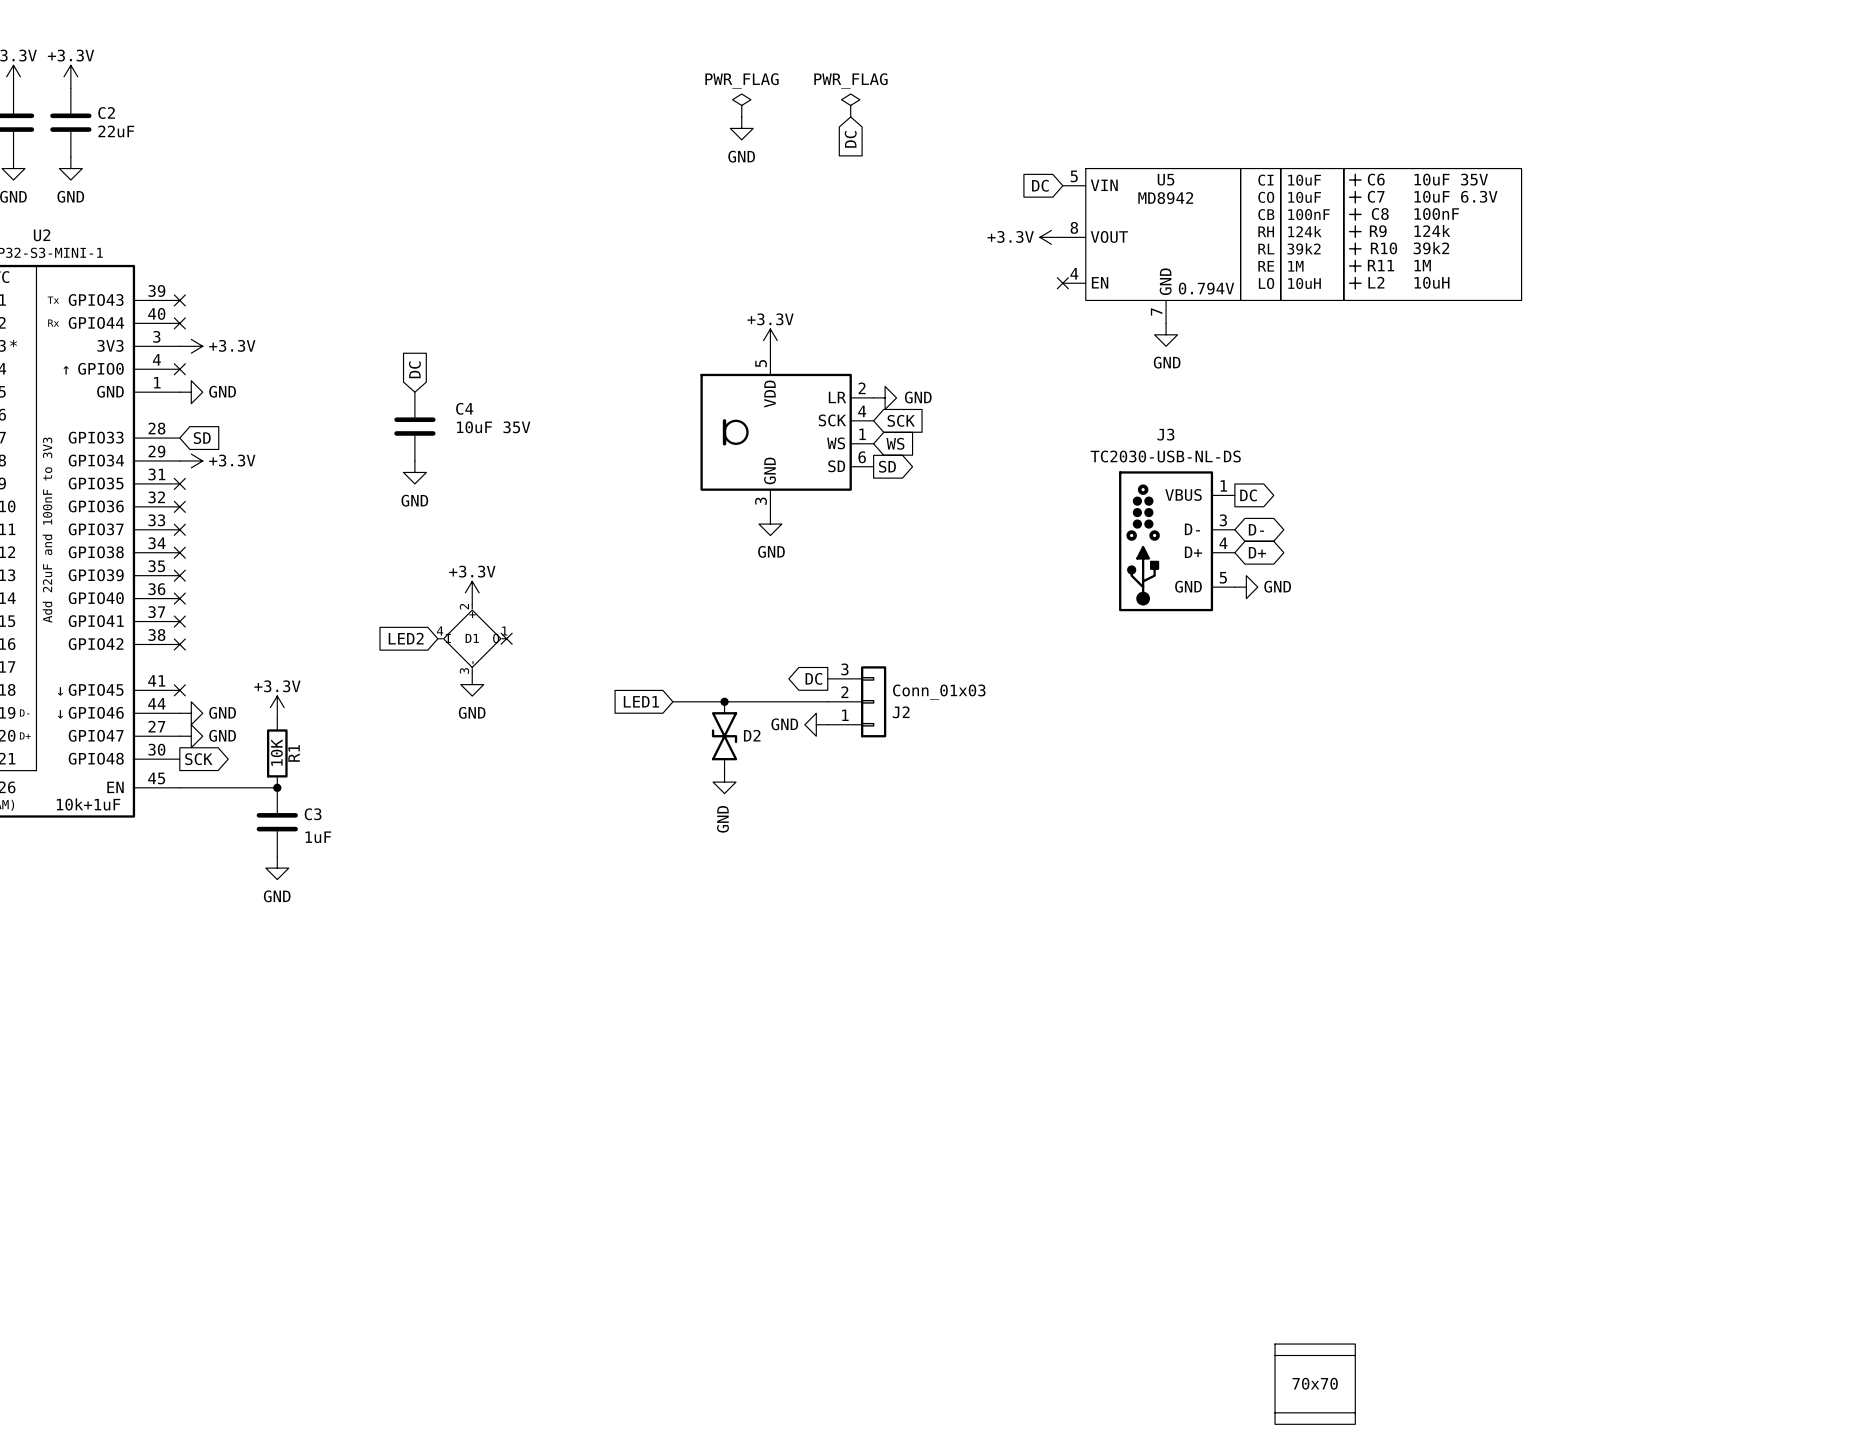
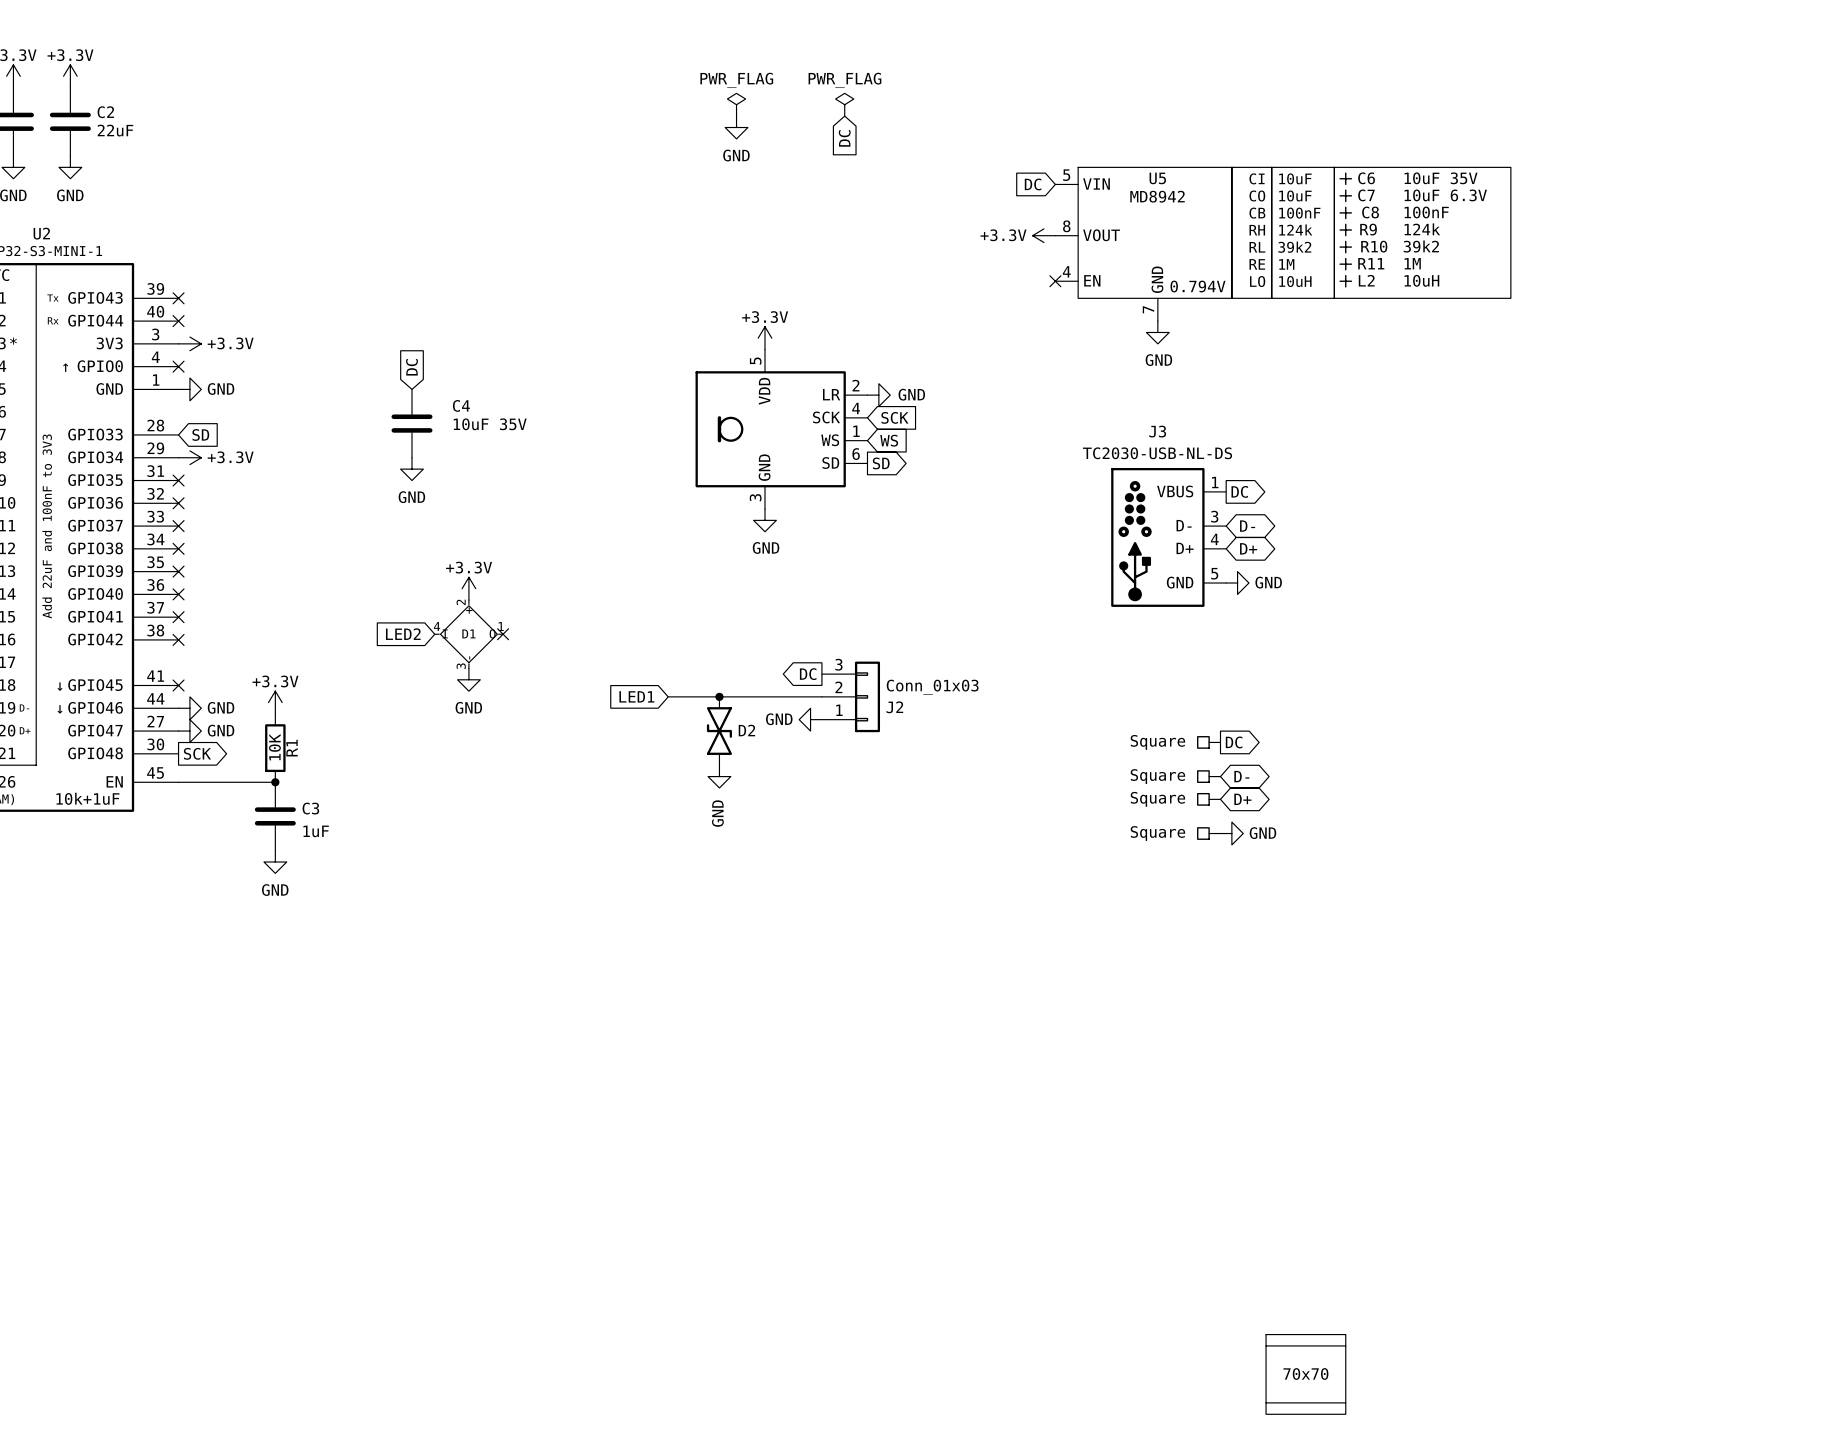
part: none -> Square (1208, 742)
global label: none -> DC (1234, 742)
part: none -> Square (1208, 776)
global label: none -> D- (1241, 776)
part: none -> Square (1208, 799)
global label: none -> D+ (1242, 799)
part: none -> Square (1208, 833)
power symbol: none -> GND (1231, 833)

